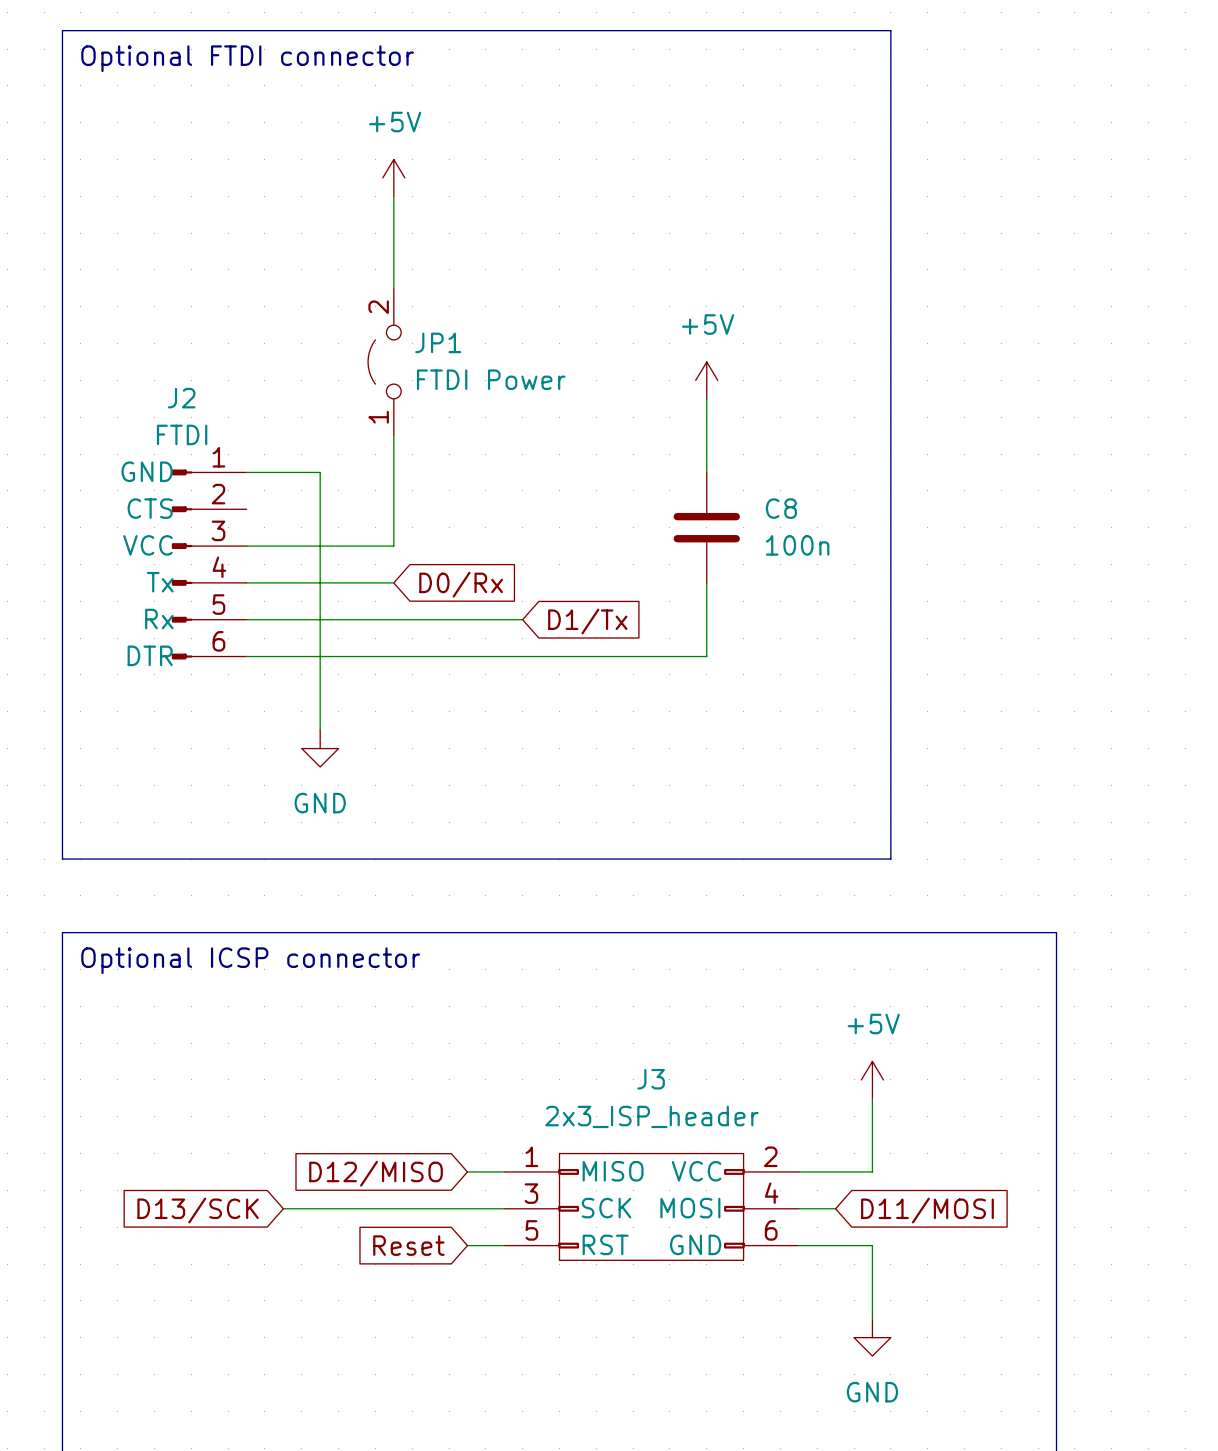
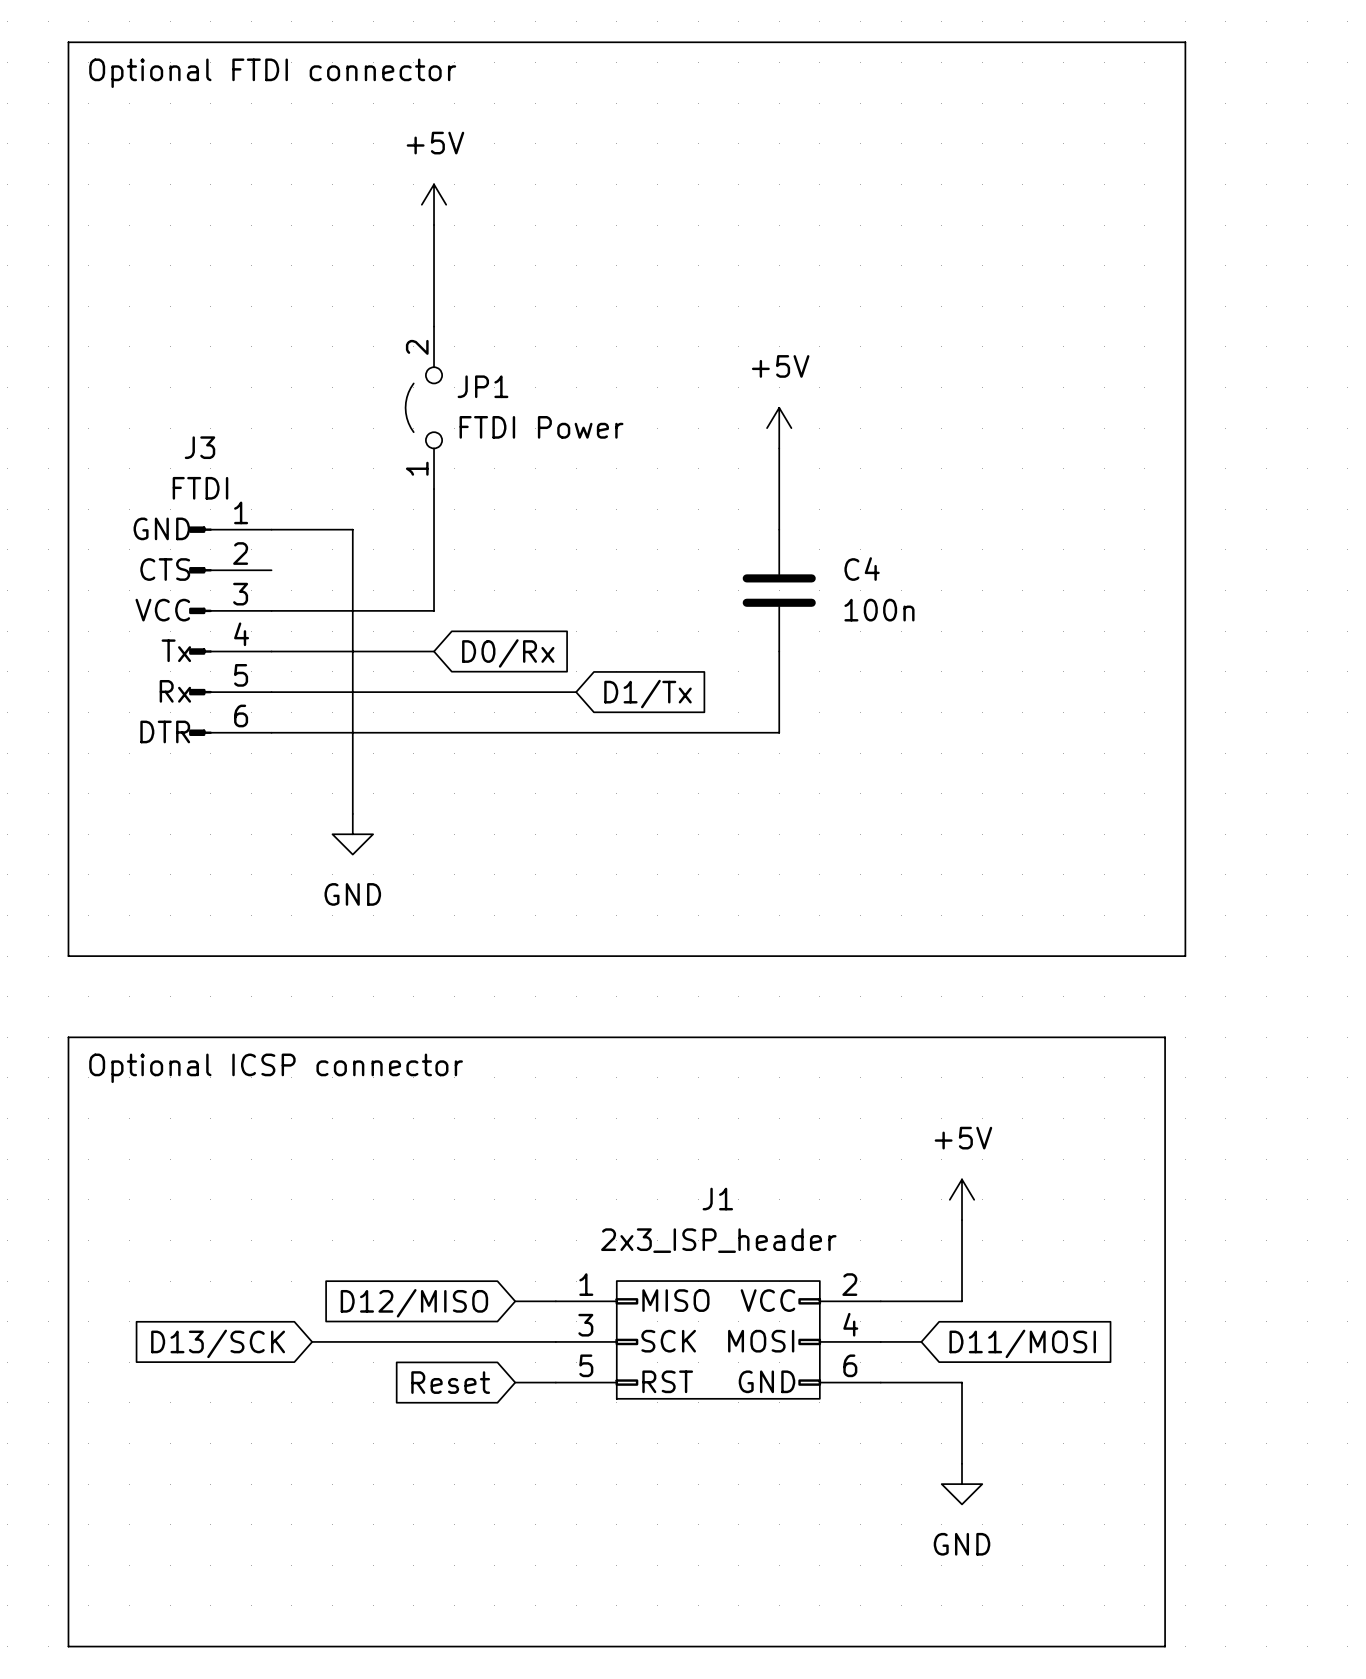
line: (890, 30) (890, 859) -> (982, 42) (1185, 42) (1185, 956) (982, 956)
J2 name: J2 (181, 398) -> J3 (199, 447)
C8 name: C8 (781, 508) -> C4 (862, 569)
J3 name: J3 (651, 1079) -> J1 (717, 1199)

